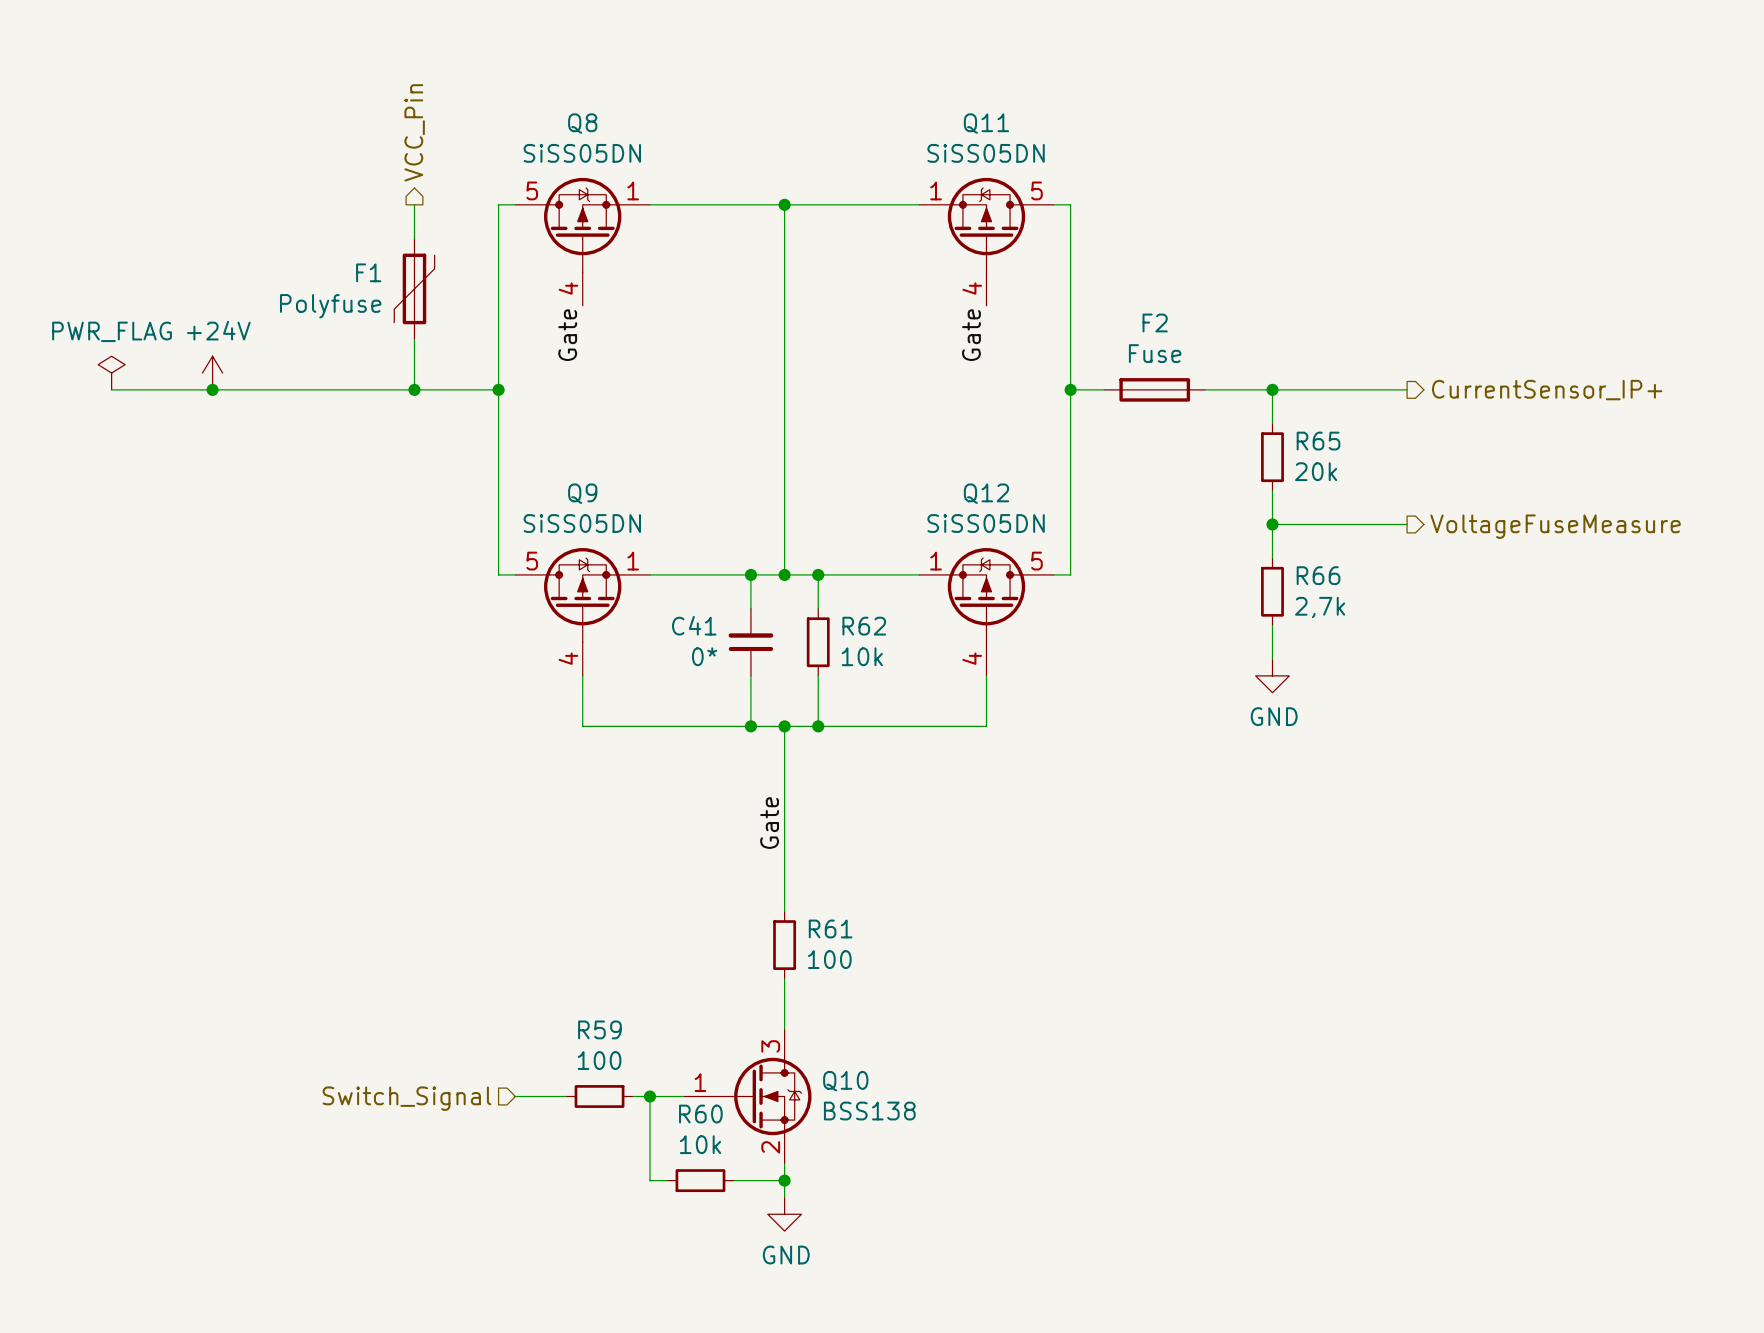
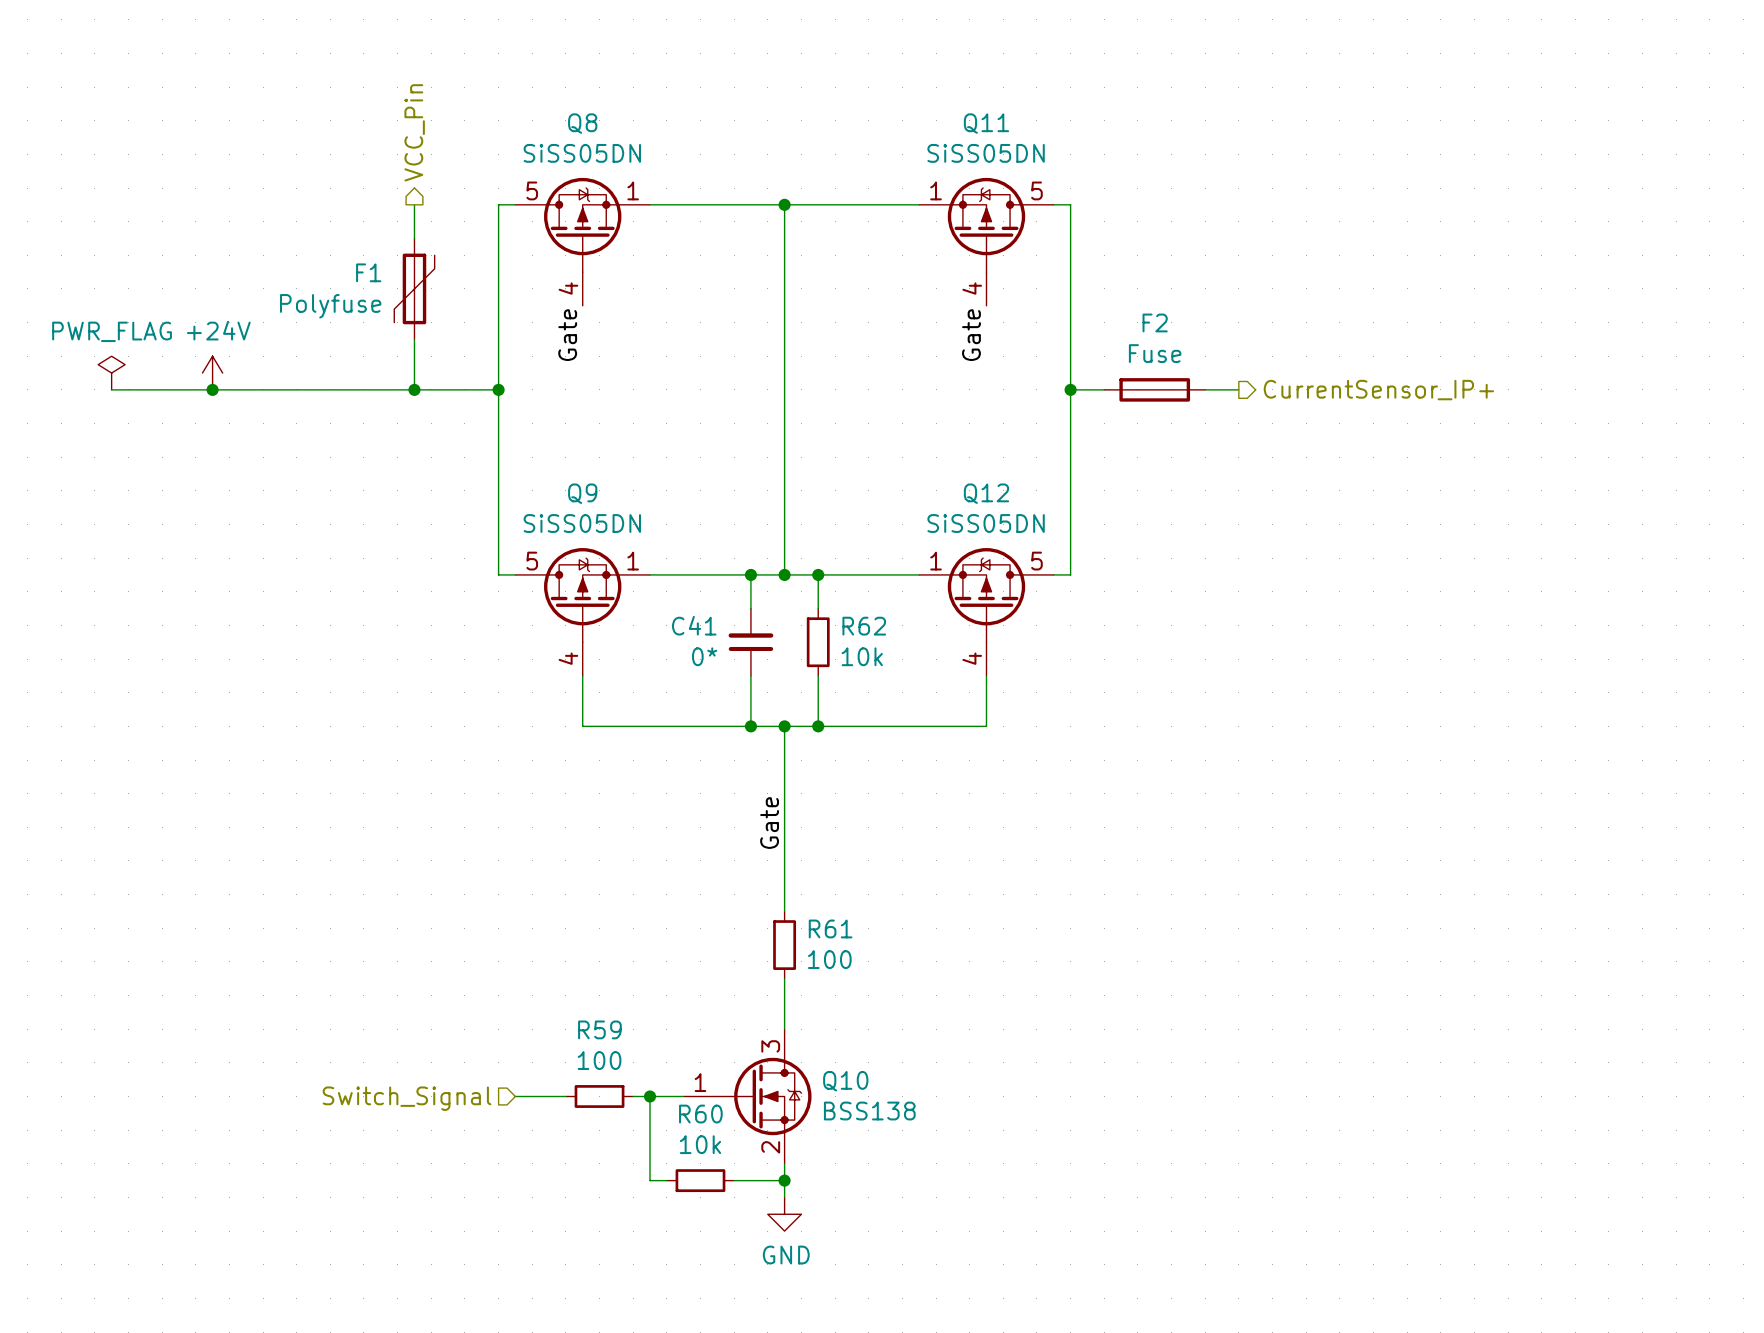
wire: (1238, 389) (1407, 389) -> none
wire: (1272, 389) (1272, 423) -> none
junction: (1272, 389) -> none
hierarchical label position: CurrentSensor_IP+ (1547, 390) -> CurrentSensor_IP+ (1378, 390)
R65: 20k (1272, 457) -> none
wire: (1272, 490) (1272, 558) -> none
wire: (1272, 524) (1407, 524) -> none
junction: (1272, 524) -> none
hierarchical label: VoltageFuseMeasure (1555, 526) -> none
R66: 2,7k (1272, 591) -> none
wire: (1272, 625) (1272, 659) -> none
power symbol: GND (1272, 675) -> none

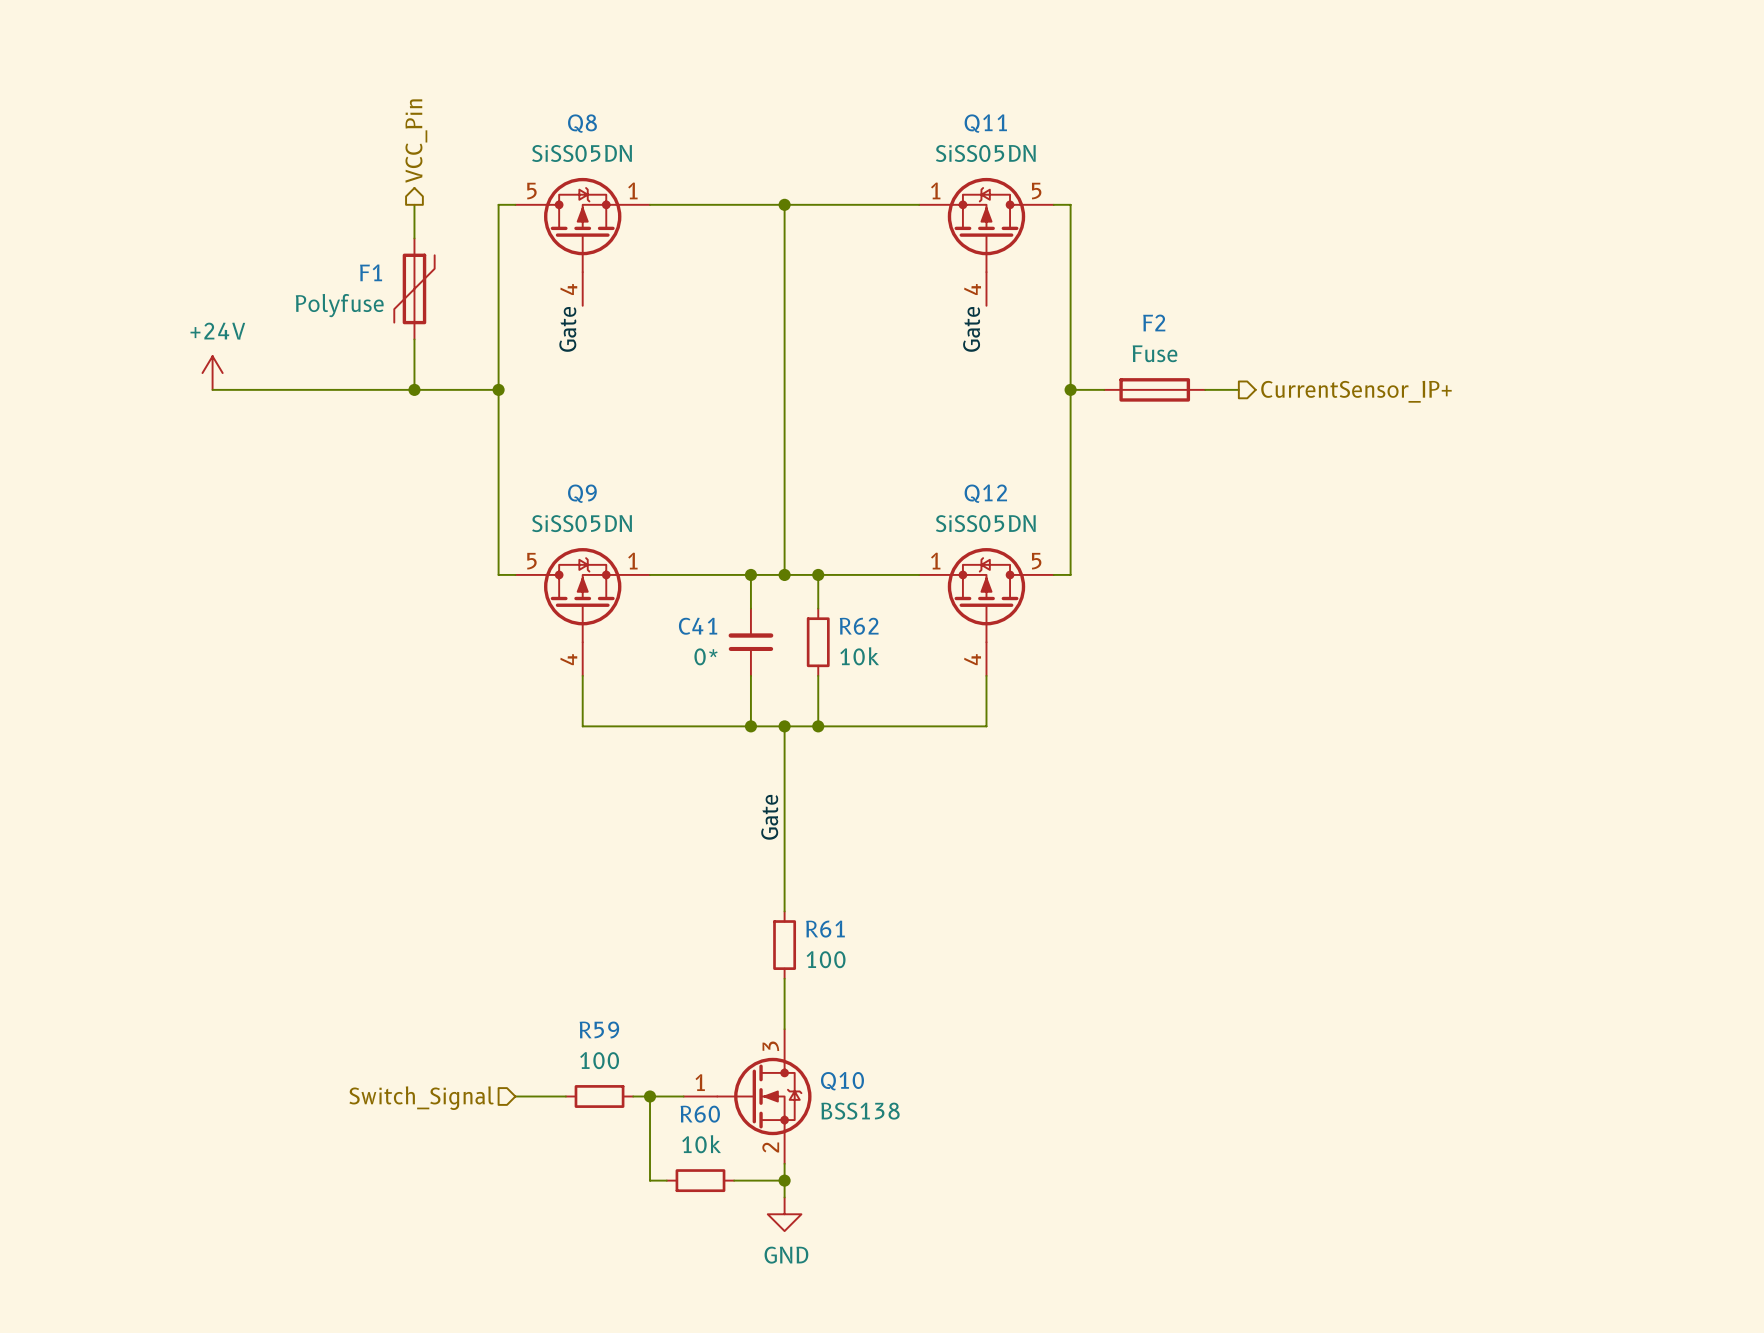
power symbol: PWR_FLAG (111, 373) -> none
wire: (111, 389) (212, 389) -> none
junction: (212, 389) -> none

